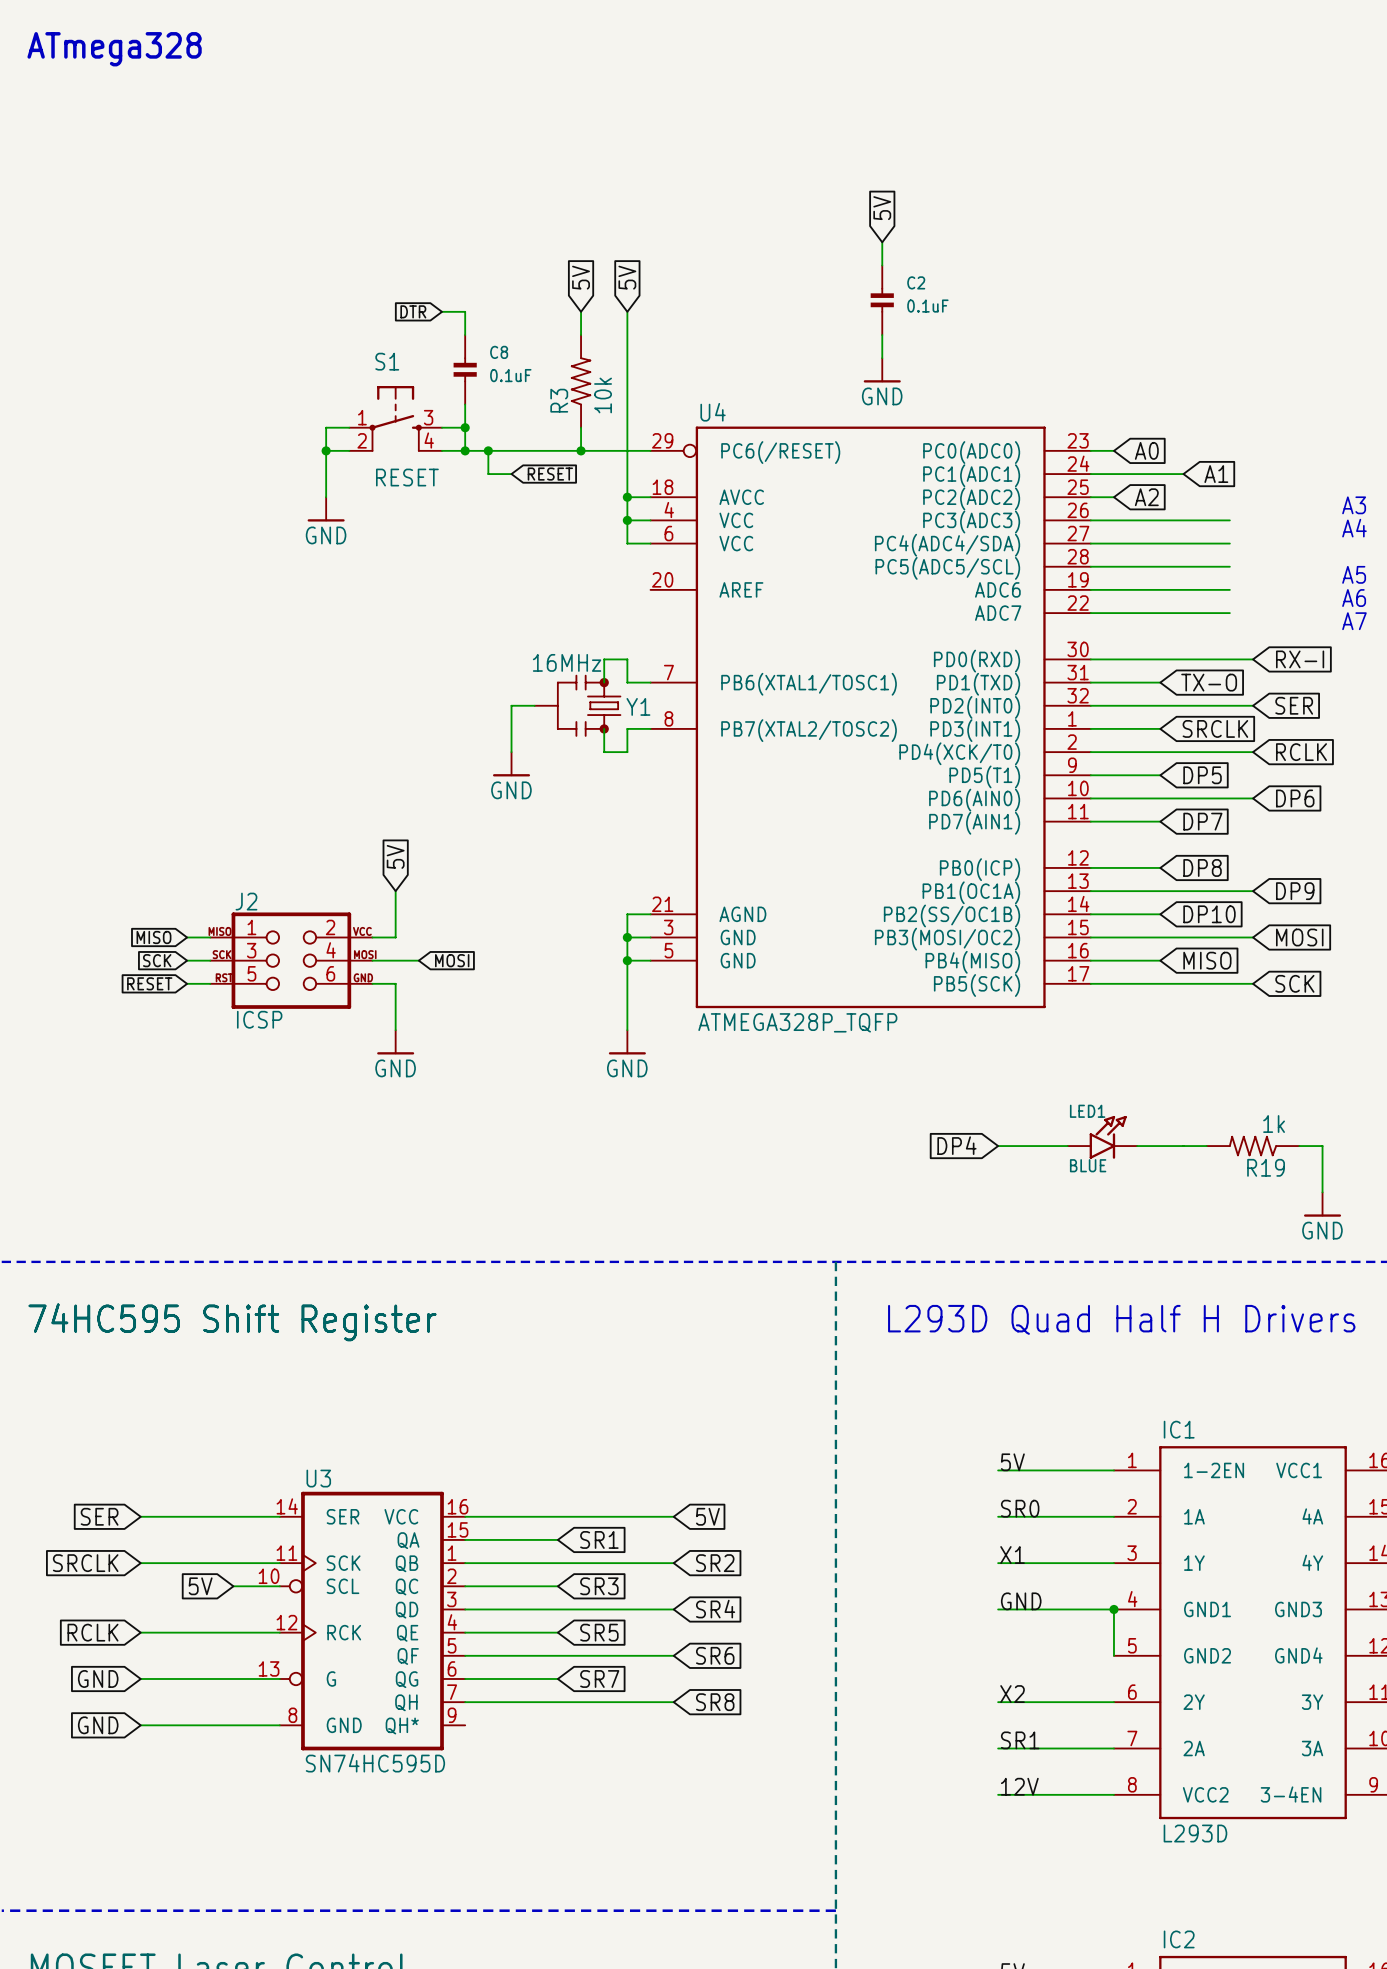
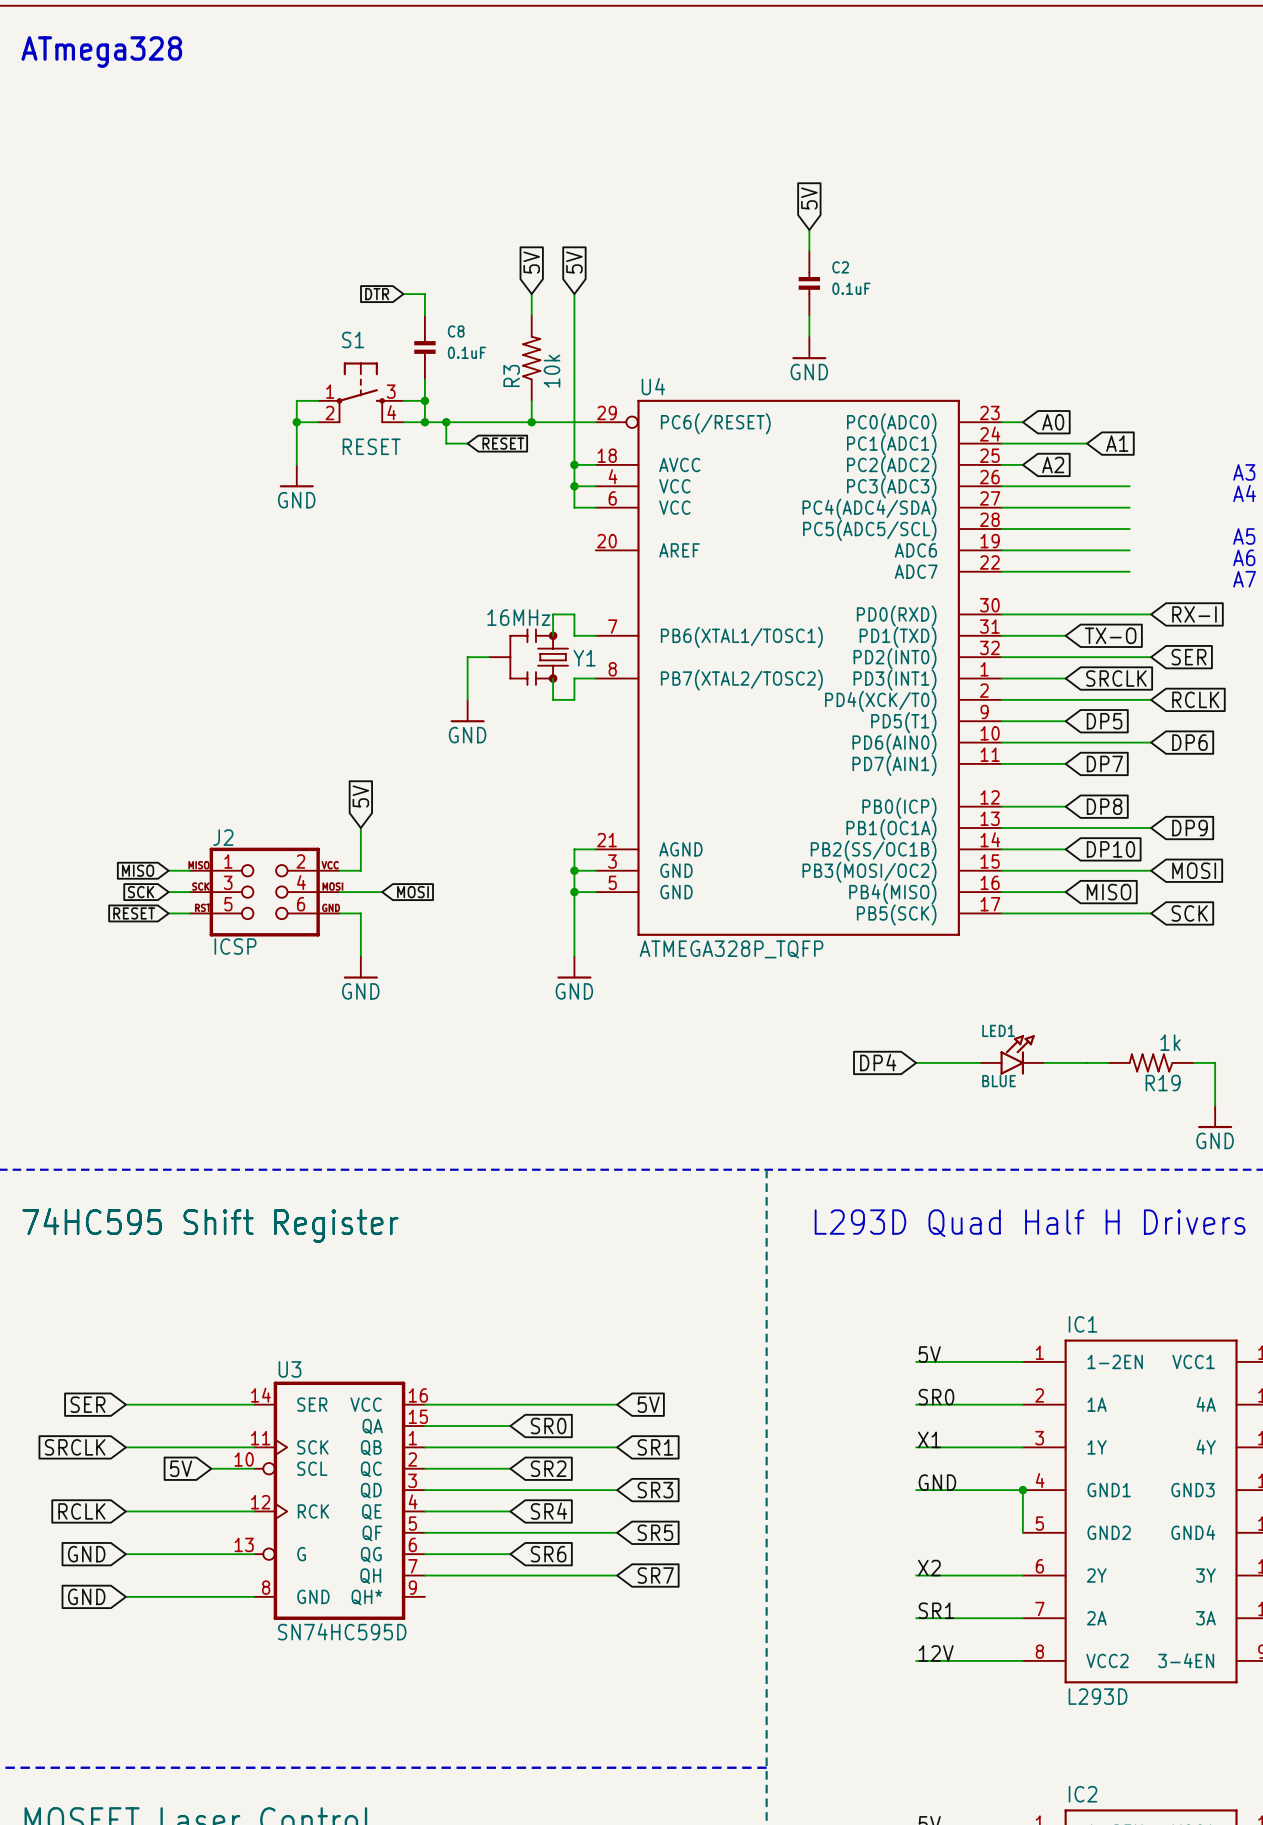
global label: SR1 (599, 1539) -> SR0 (548, 1426)
global label: SR2 (715, 1563) -> SR1 (655, 1447)
global label: SR3 (599, 1586) -> SR2 (548, 1468)
global label: SR4 (715, 1609) -> SR3 (655, 1490)
global label: SR5 (599, 1632) -> SR4 (548, 1511)
global label: SR6 (715, 1655) -> SR5 (655, 1532)
global label: SR7 (599, 1678) -> SR6 (548, 1554)
global label: SR8 (715, 1702) -> SR7 (655, 1575)

